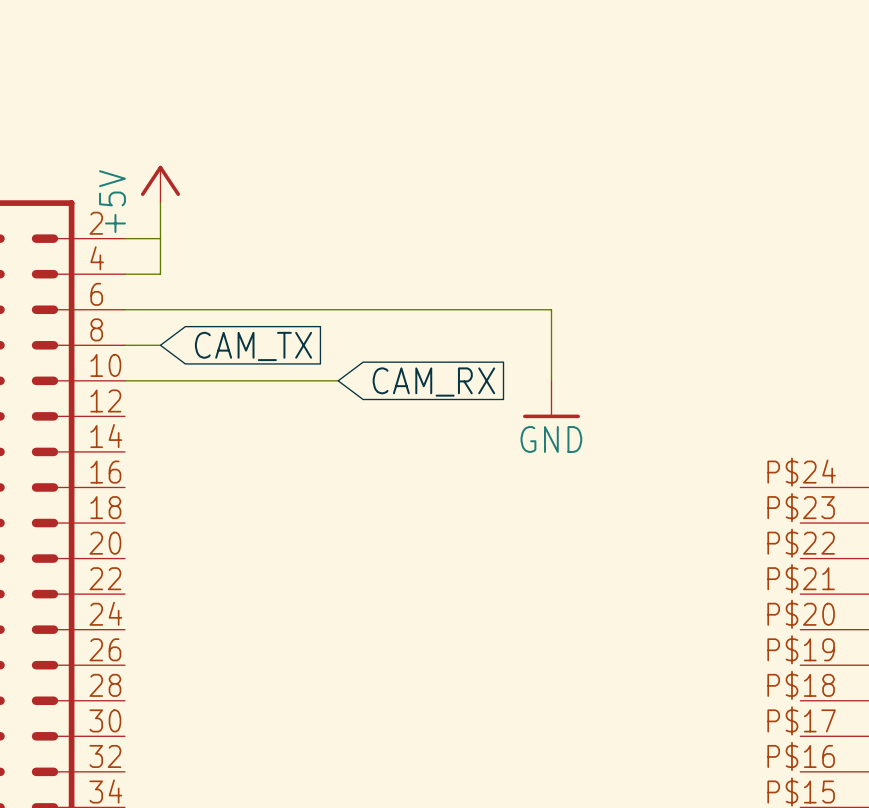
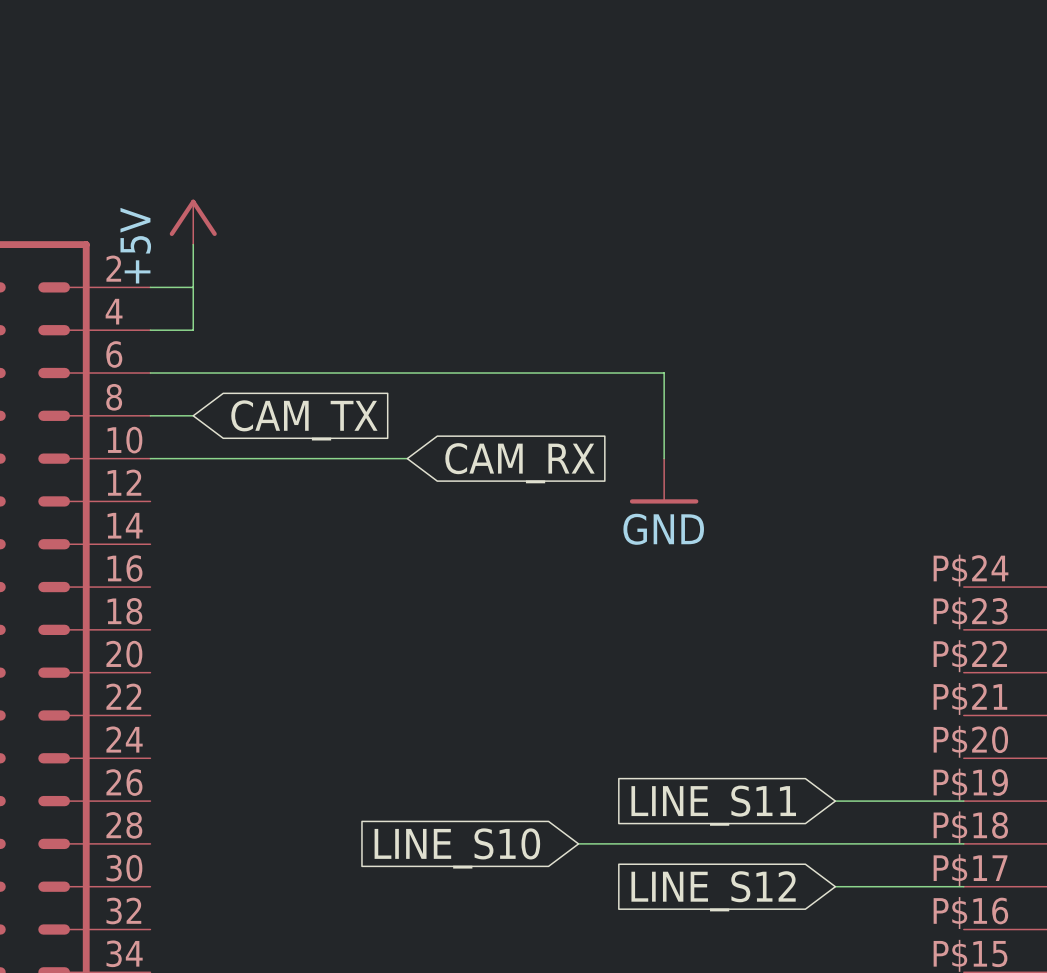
wire: none -> (835, 801) (963, 801)
global label: none -> LINE_S11 (713, 805)
wire: none -> (578, 843) (963, 843)
global label: none -> LINE_S10 (457, 848)
wire: none -> (835, 886) (963, 886)
global label: none -> LINE_S12 (713, 891)

